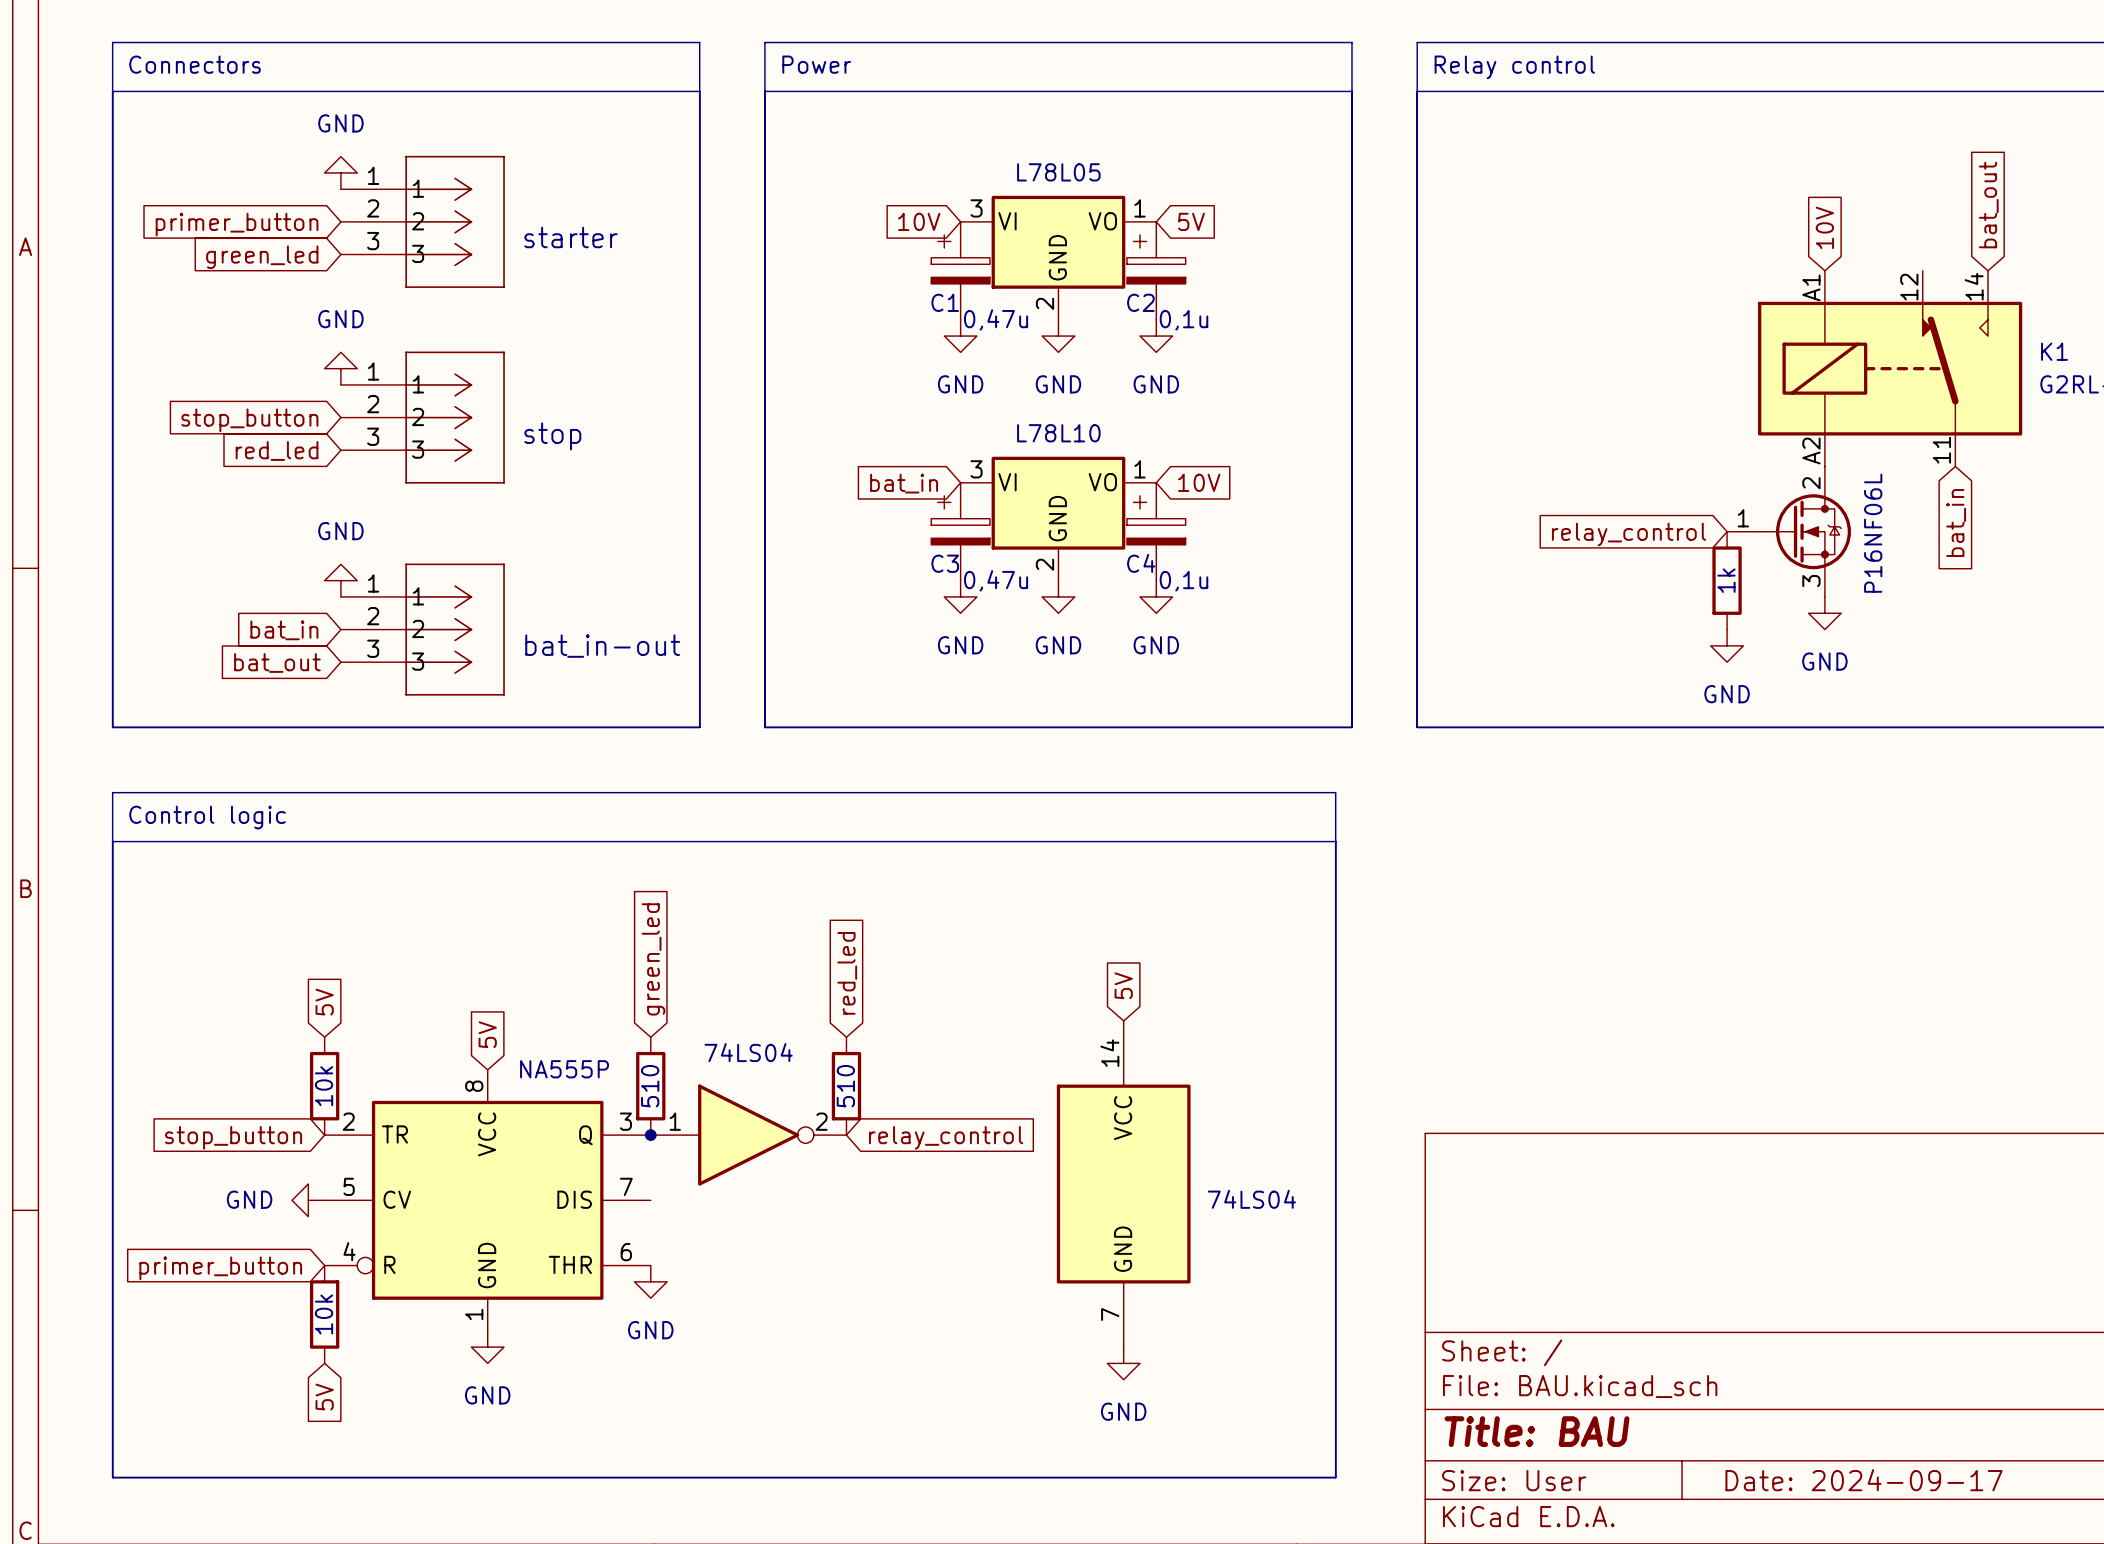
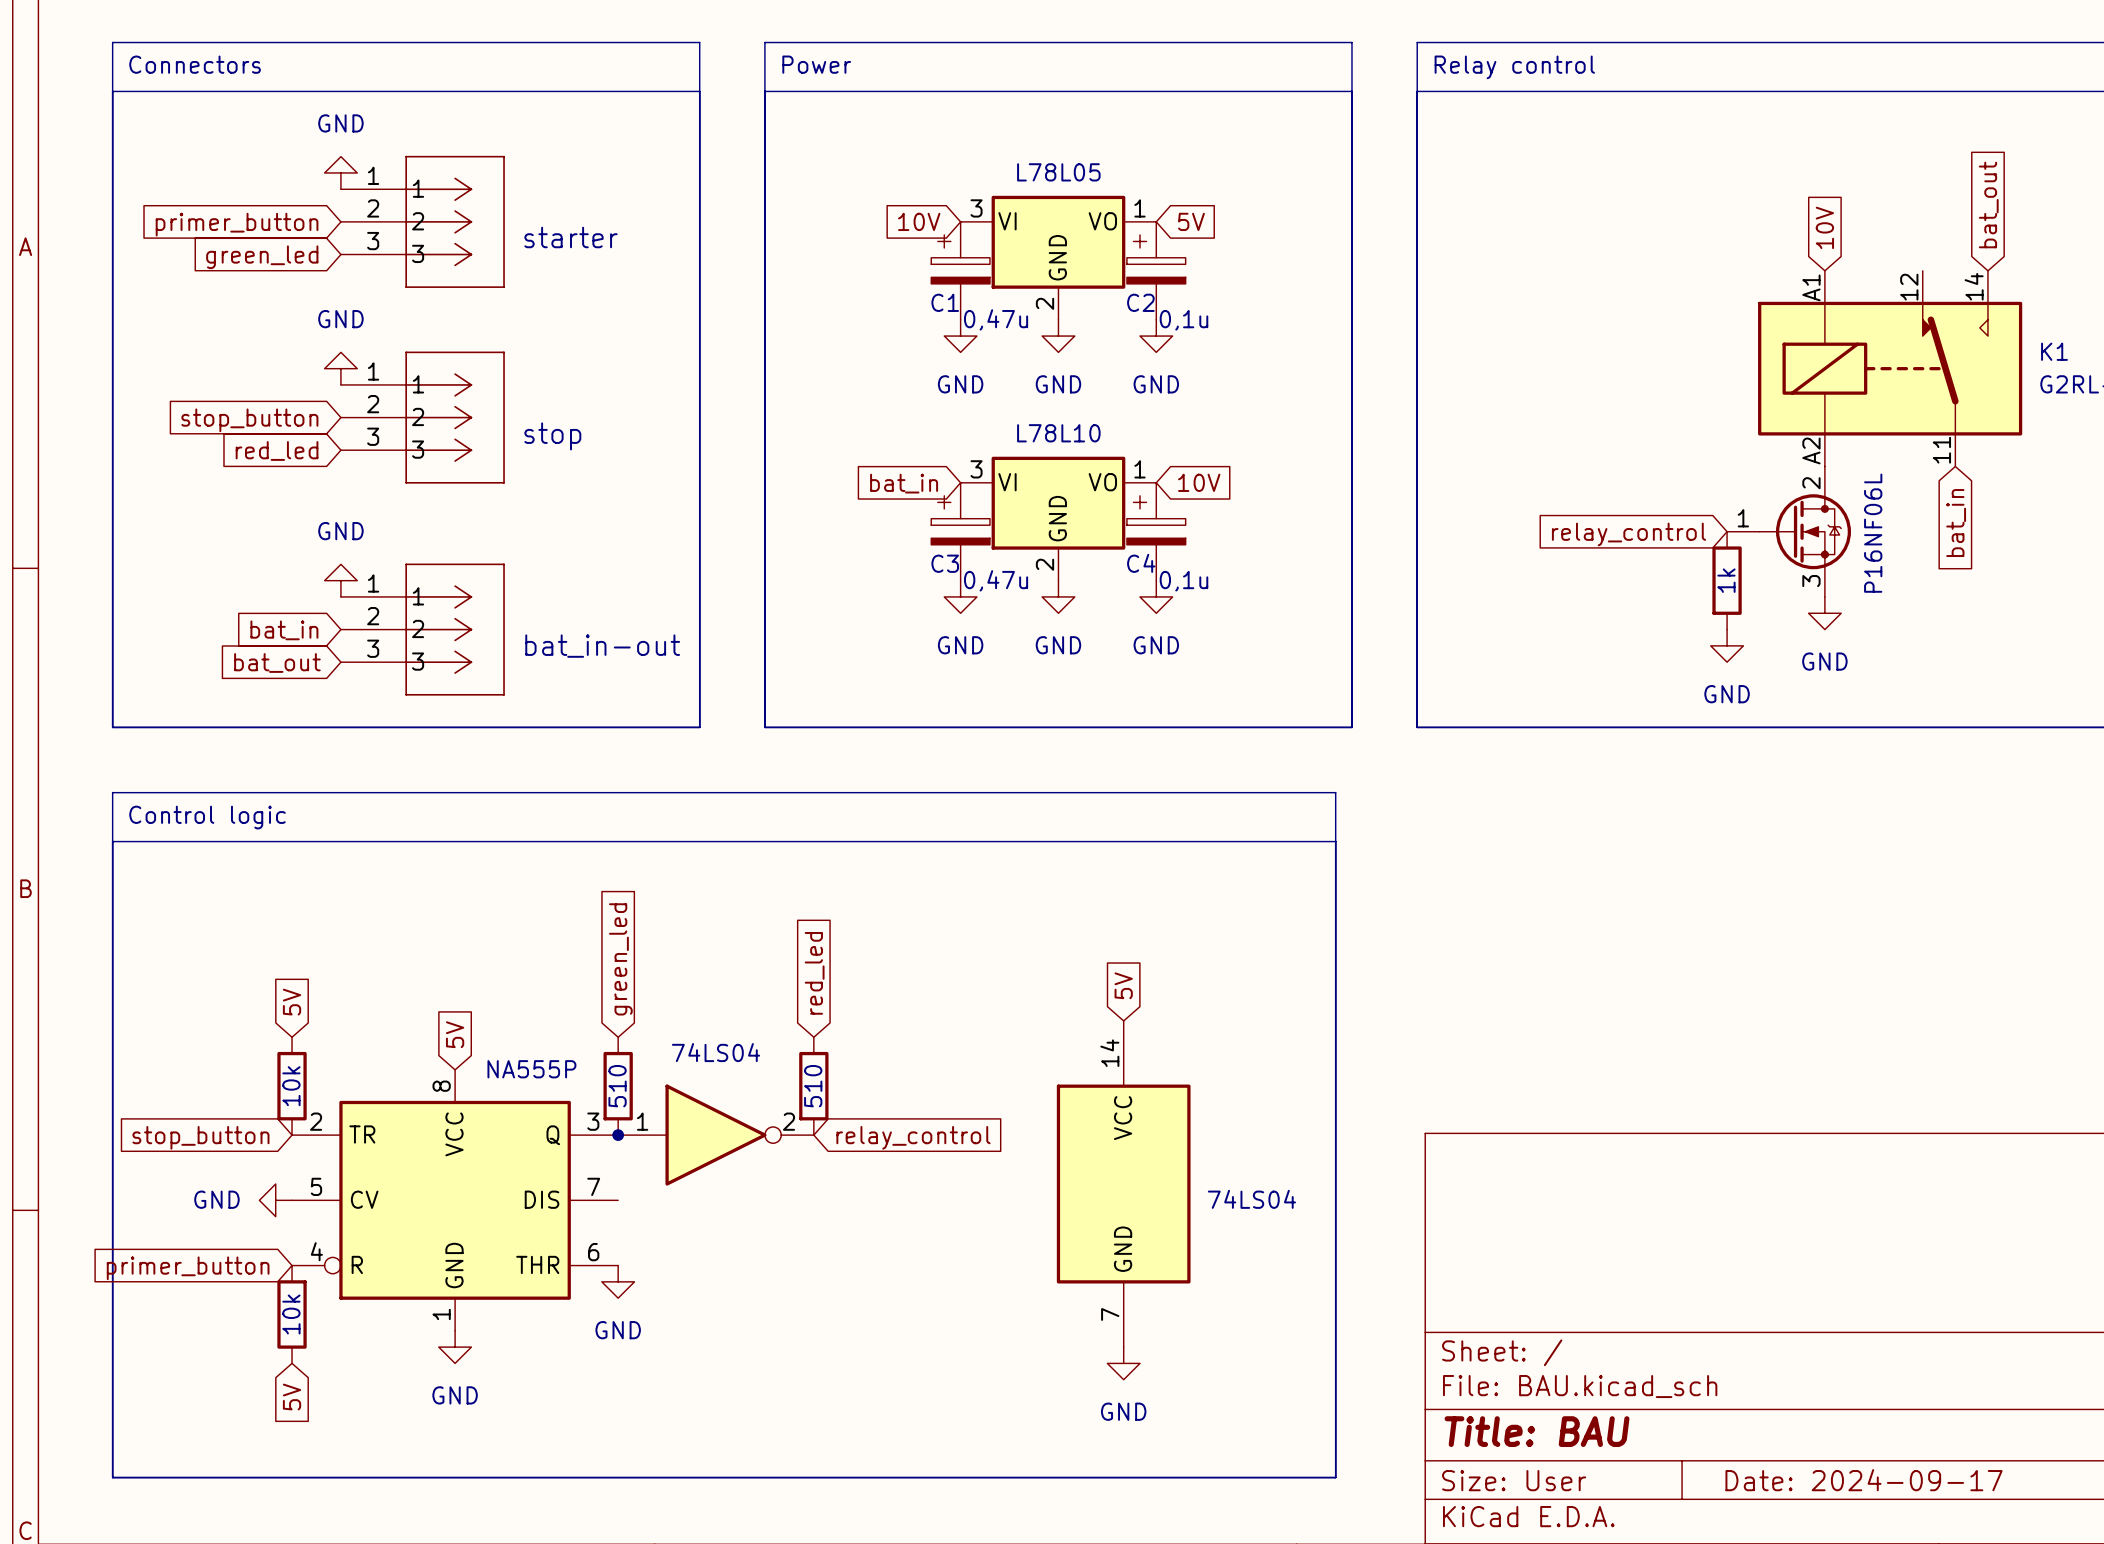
global label position: green_led (653, 959) -> green_led (620, 959)
global label position: red_led (847, 973) -> red_led (814, 973)
global label position: 5V (324, 1002) -> 5V (292, 1002)
global label position: 5V (487, 1034) -> 5V (455, 1034)
part position: (324, 1086) -> (292, 1086)
part position: (650, 1086) -> (618, 1086)
part position: (846, 1086) -> (813, 1086)
junction position: (650, 1135) -> (618, 1135)
part position: (748, 1135) -> (716, 1135)
global label position: stop_button (233, 1137) -> stop_button (200, 1137)
global label position: relay_control (946, 1137) -> relay_control (913, 1137)
power symbol position: GND (308, 1200) -> GND (275, 1200)
part position: (487, 1200) -> (455, 1200)
global label position: primer_button (220, 1268) -> primer_button (188, 1268)
power symbol position: GND (650, 1281) -> GND (618, 1281)
part position: (324, 1314) -> (292, 1314)
power symbol position: GND (487, 1347) -> GND (455, 1347)
global label position: 5V (324, 1397) -> 5V (292, 1397)

